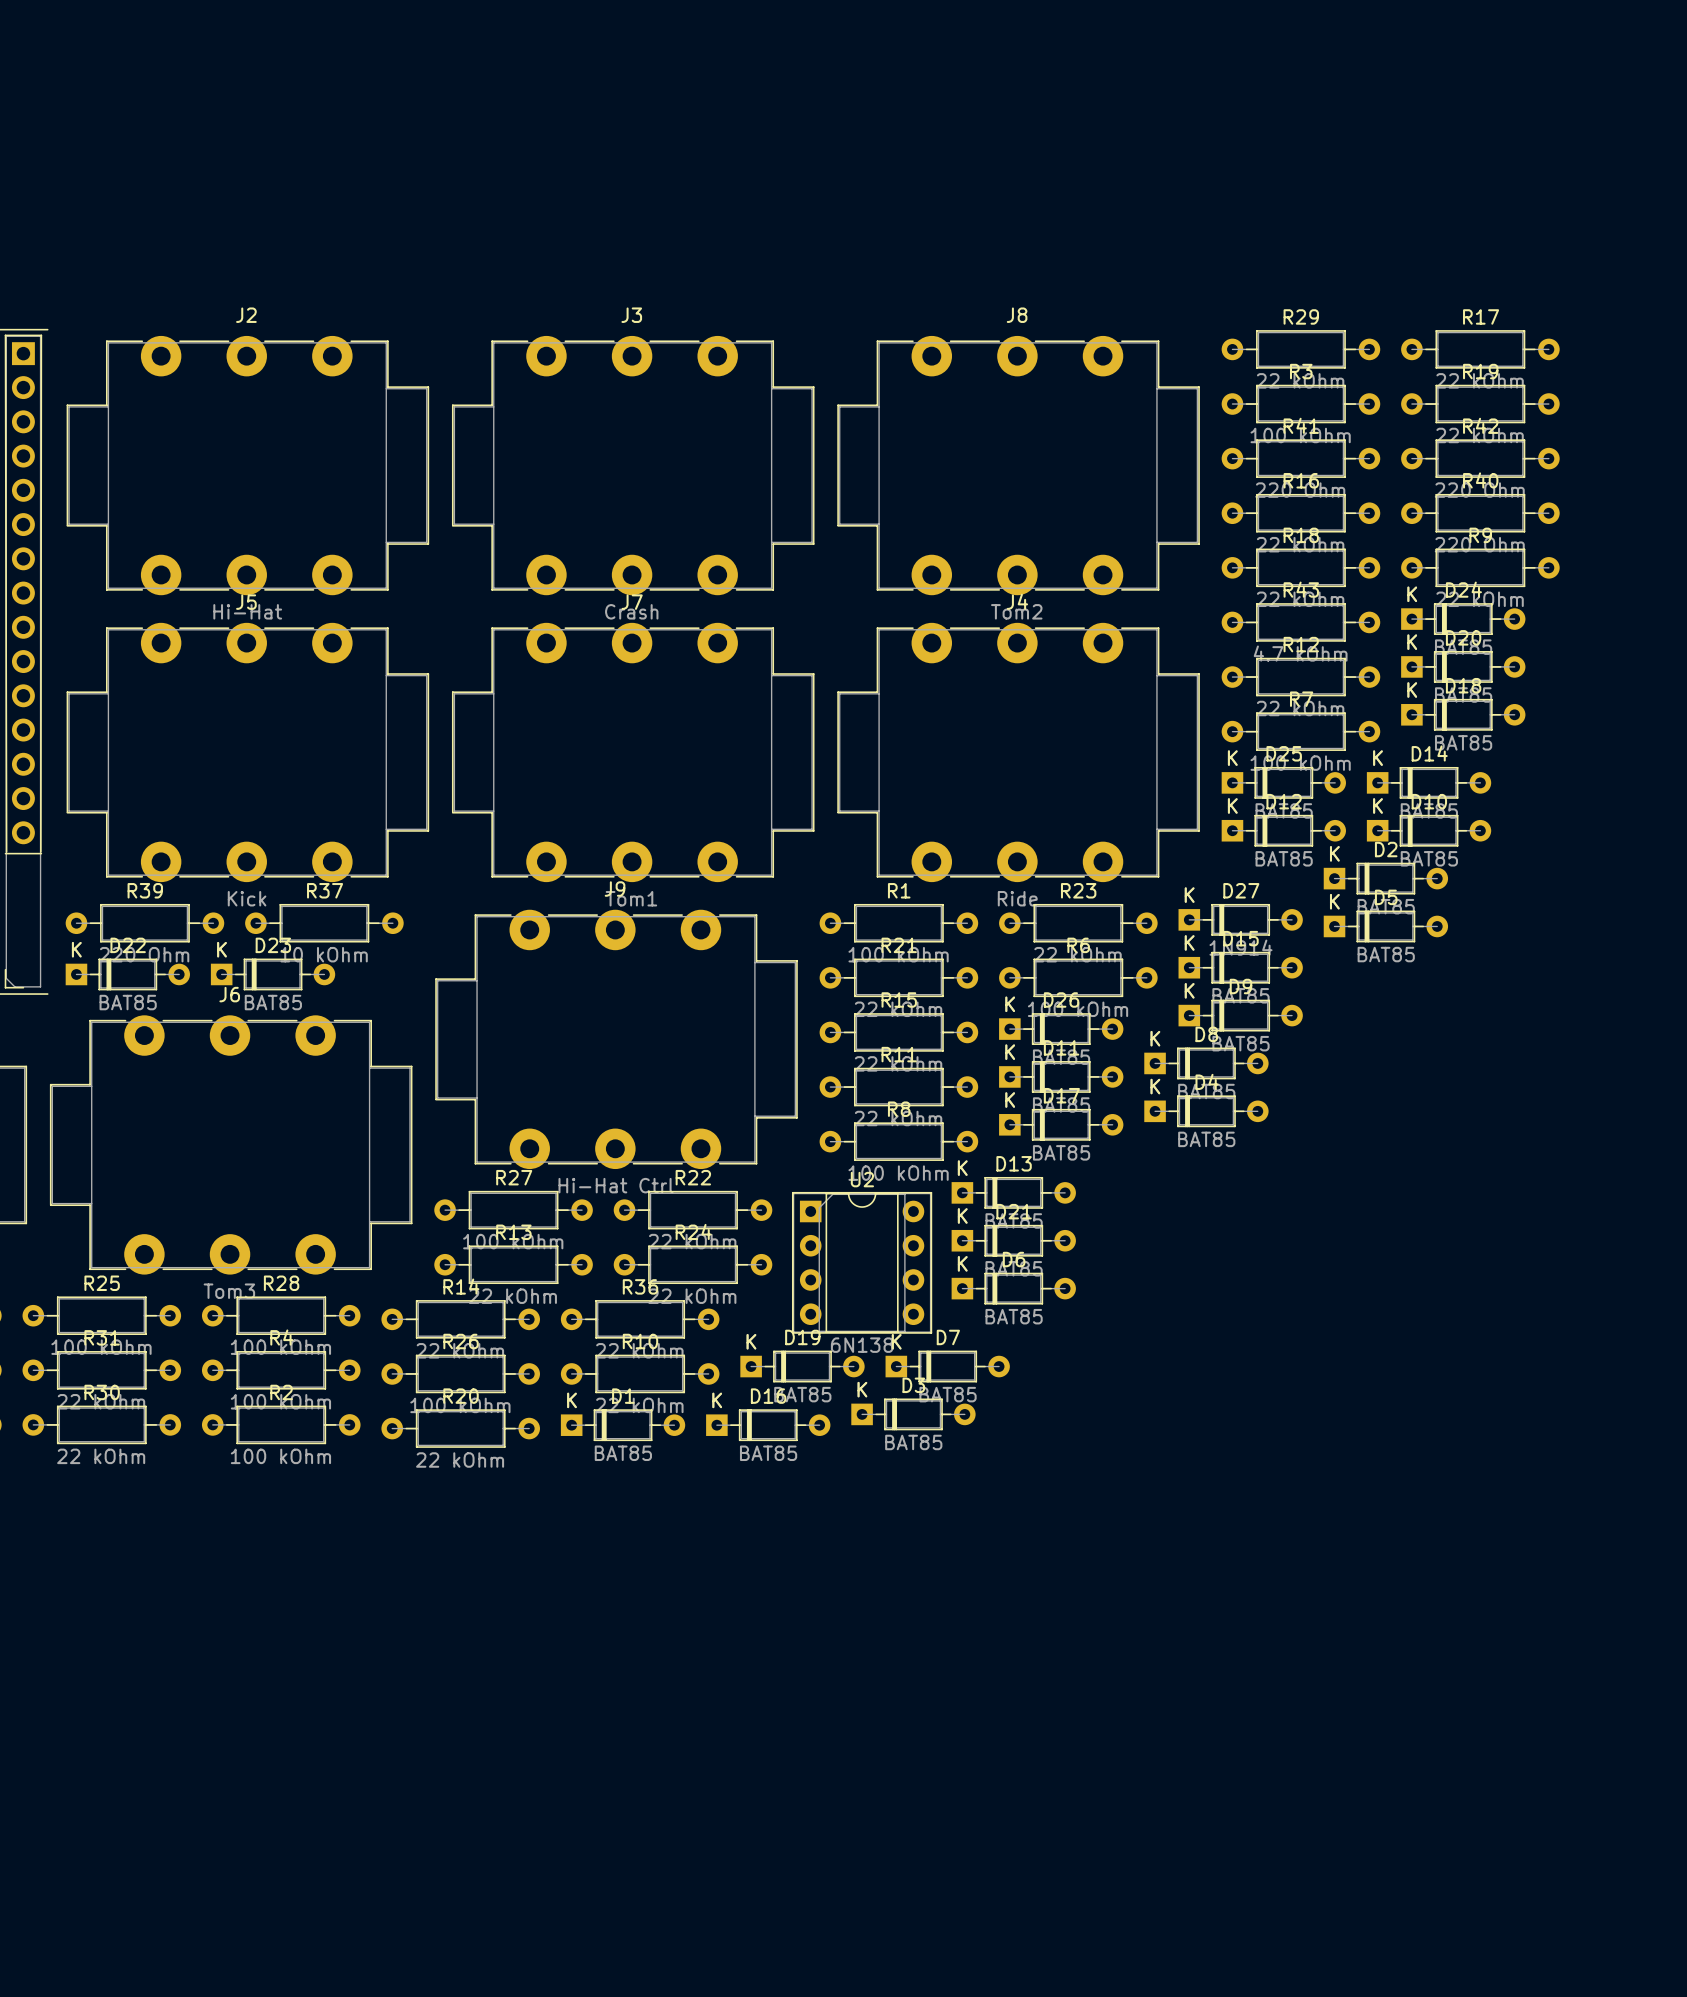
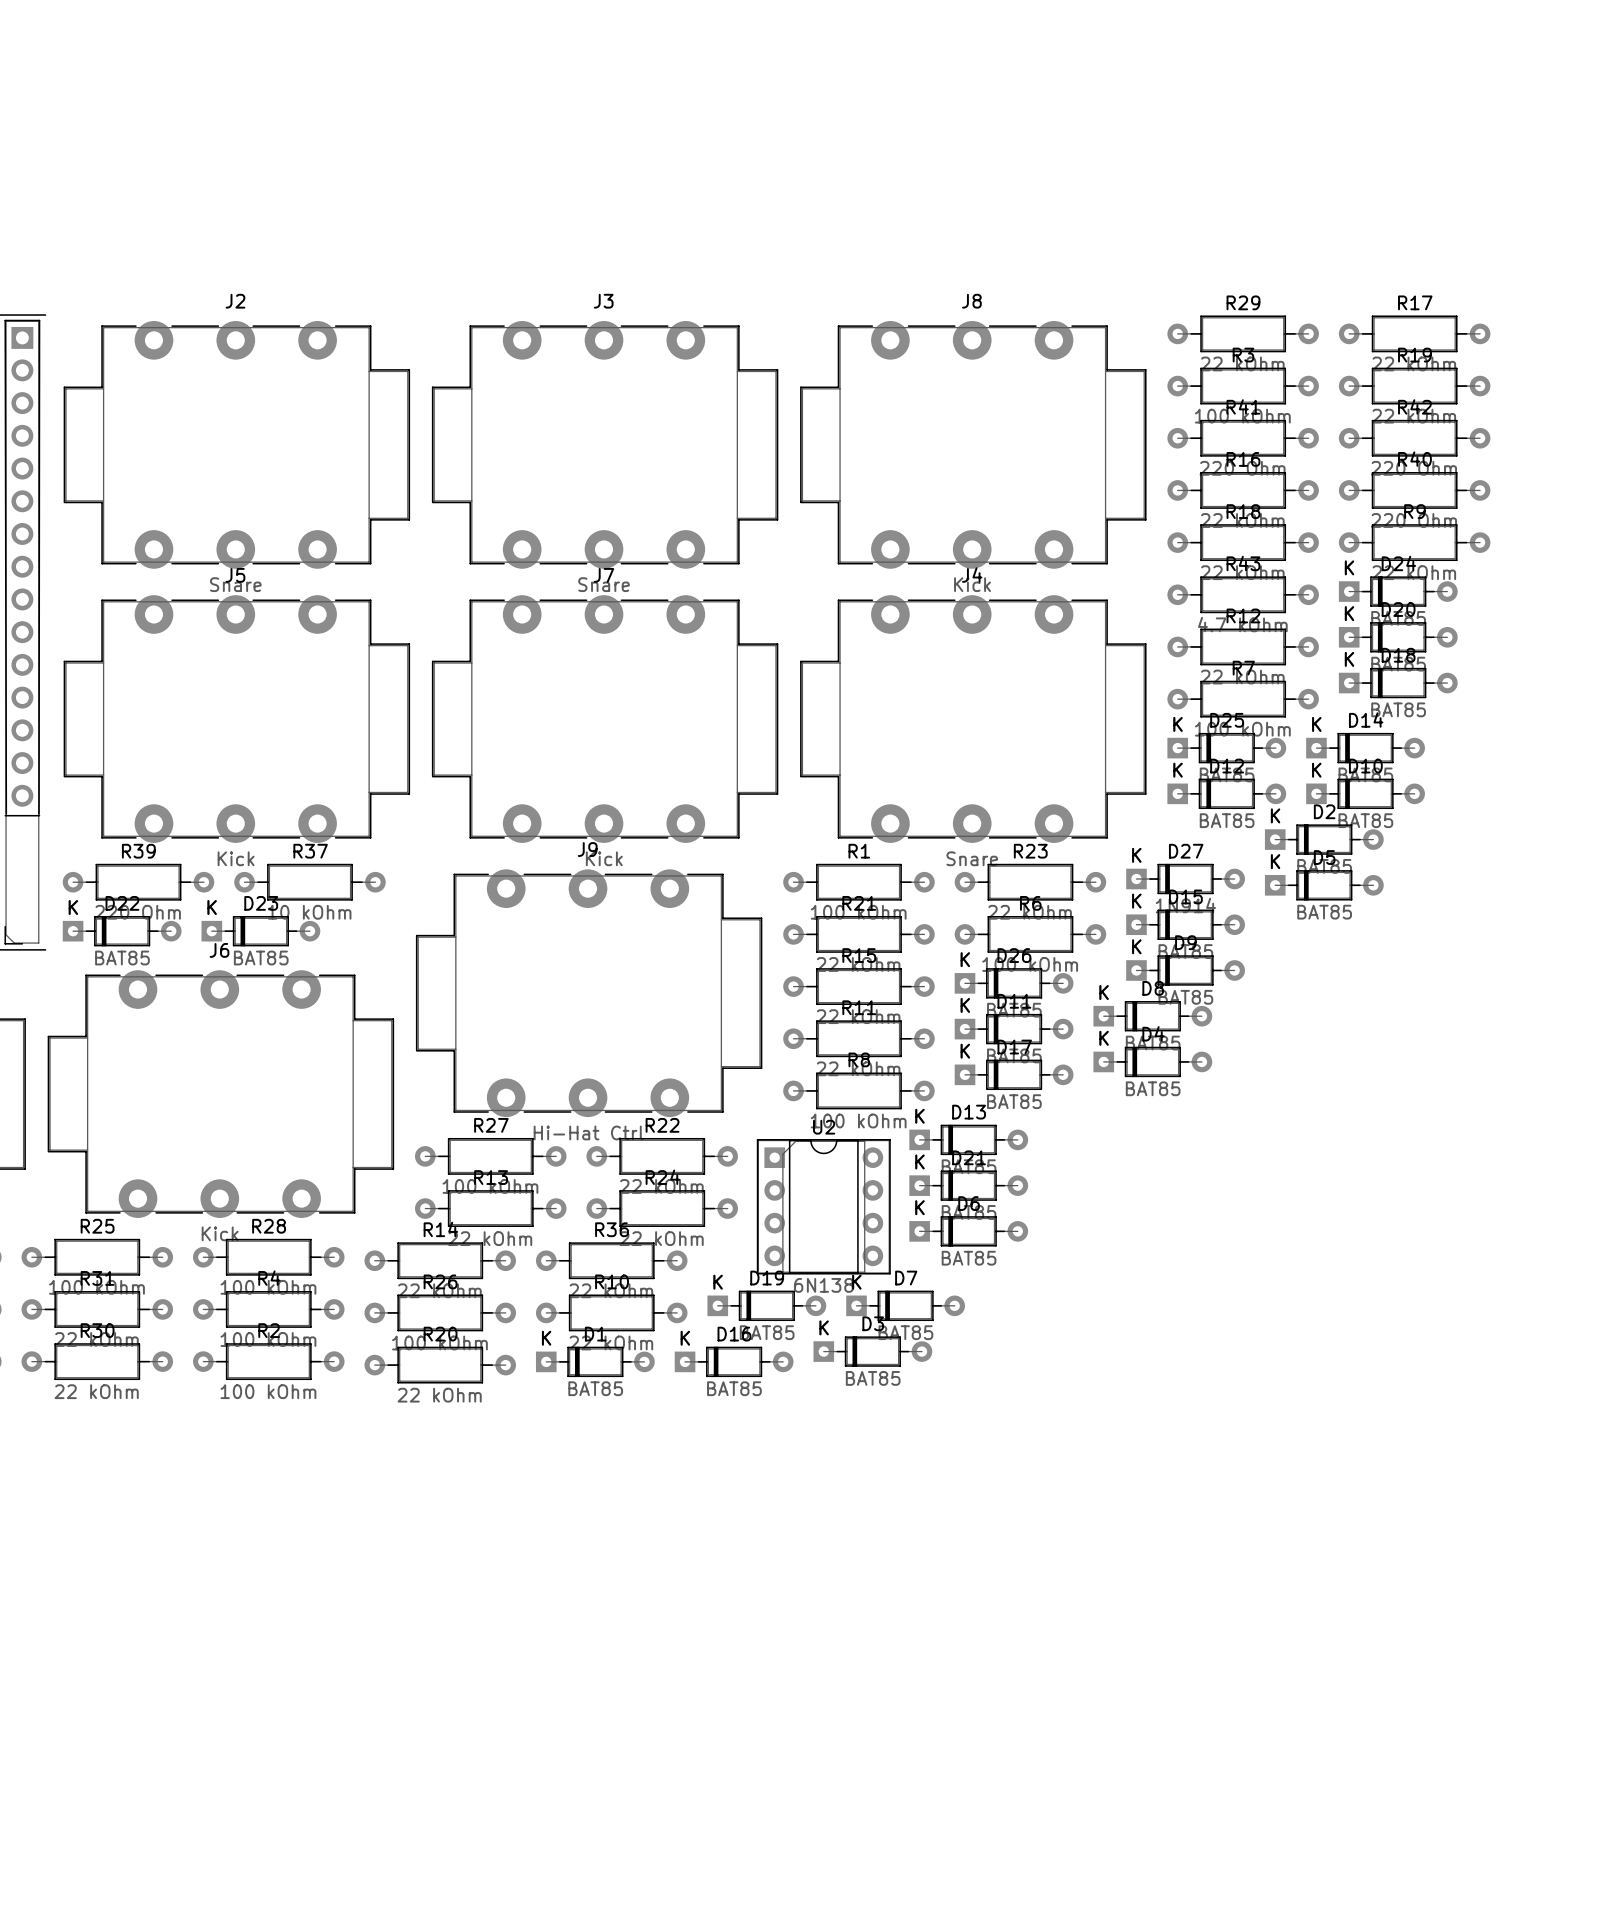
J2 value: Hi-Hat (247, 611) -> Snare (235, 584)
J3 value: Crash (631, 611) -> Snare (604, 584)
J8 value: Tom2 (1016, 611) -> Kick (972, 584)
J7 value: Tom1 (631, 898) -> Kick (604, 858)
J4 value: Ride (1017, 898) -> Snare (972, 858)
J6 value: Tom3 (229, 1291) -> Kick (220, 1233)

